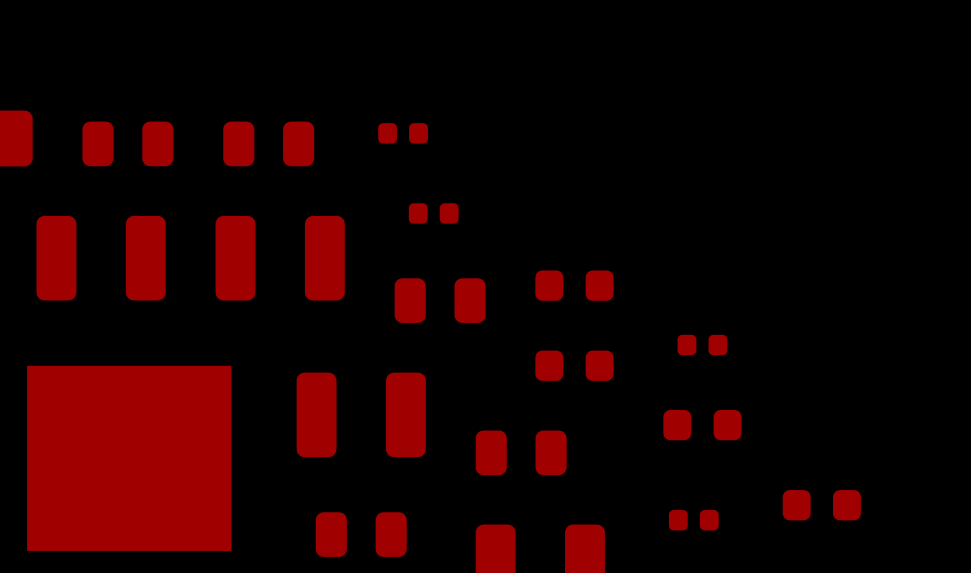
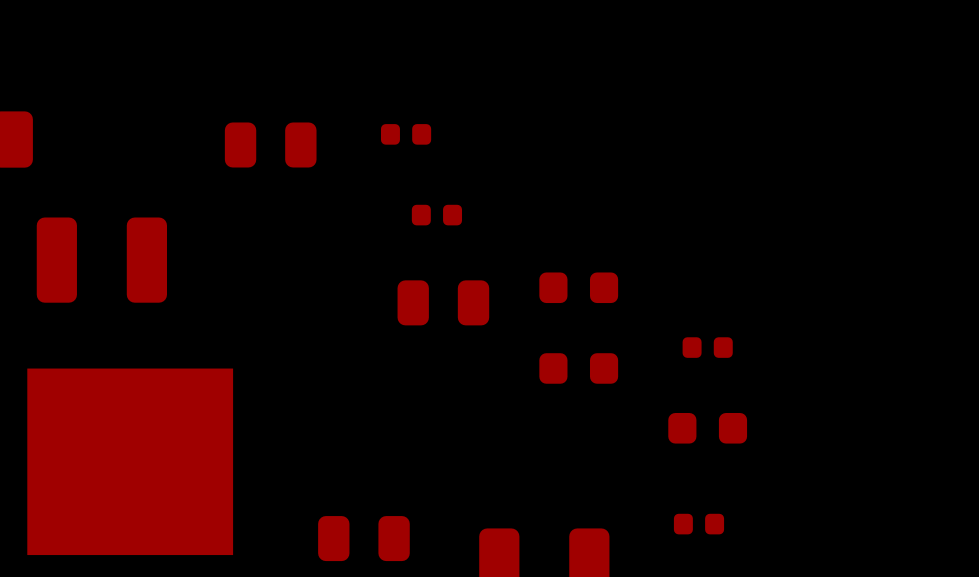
part: (127, 143) -> none
part: (280, 258) -> none
part: (361, 414) -> none
part: (521, 452) -> none
part: (821, 505) -> none

